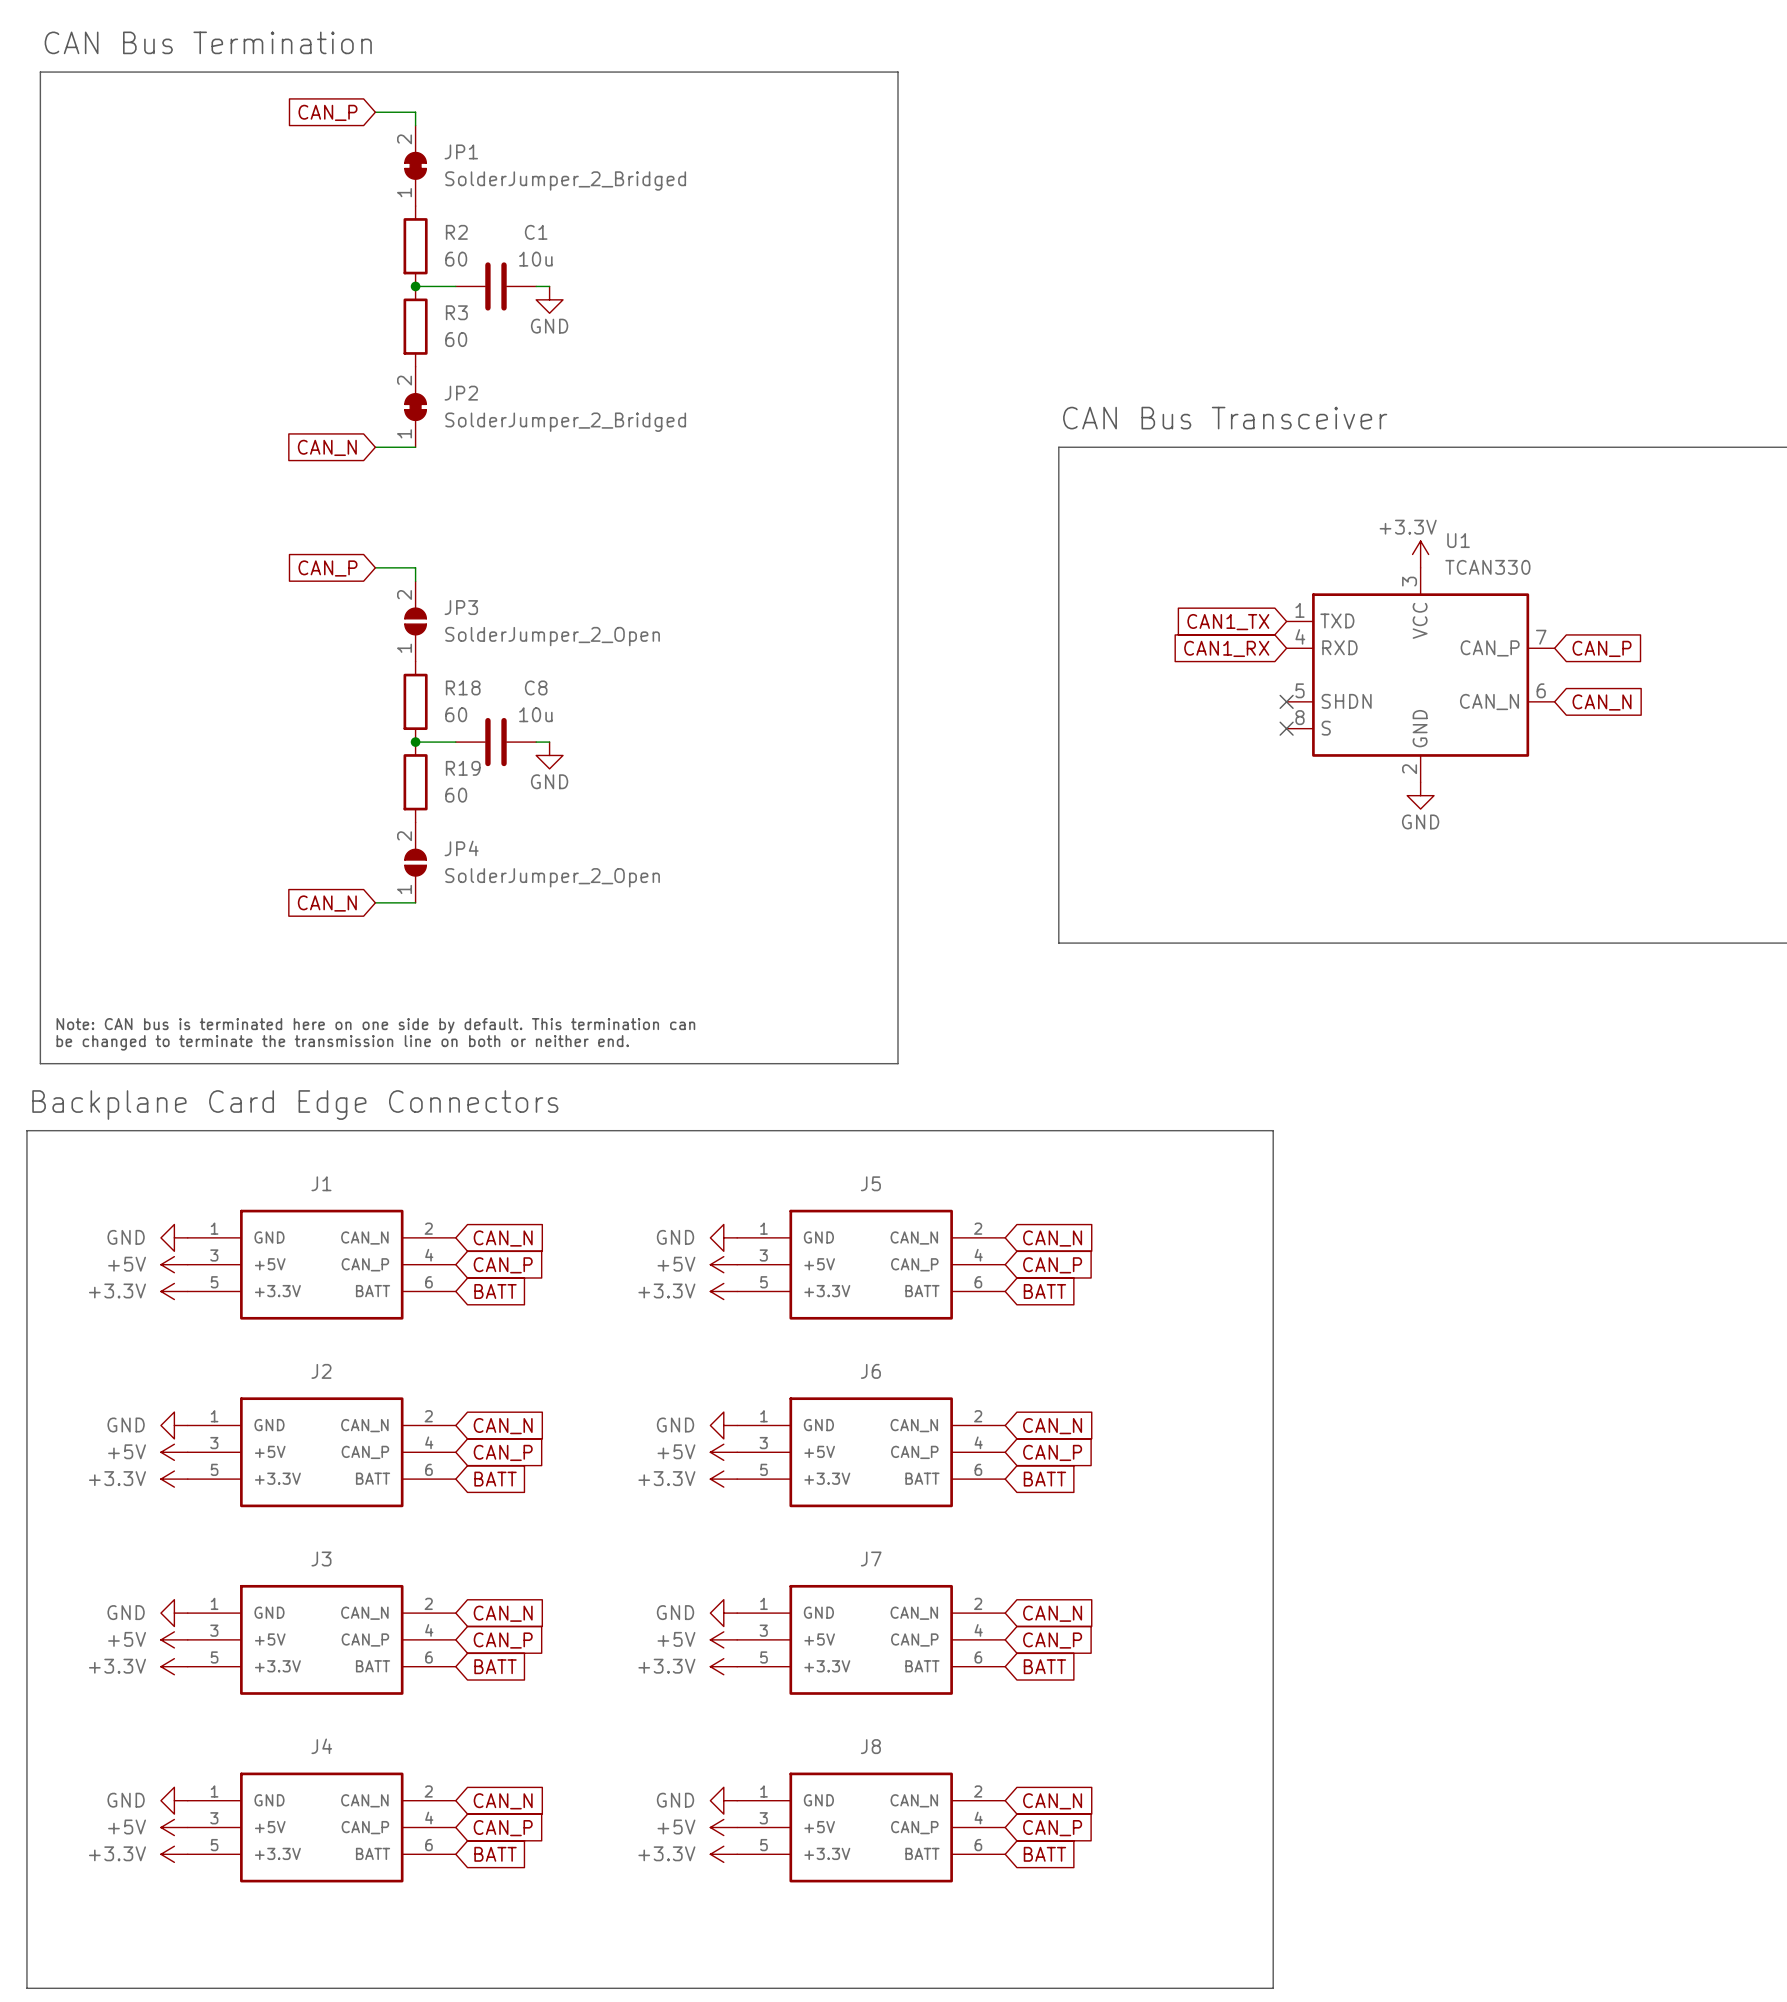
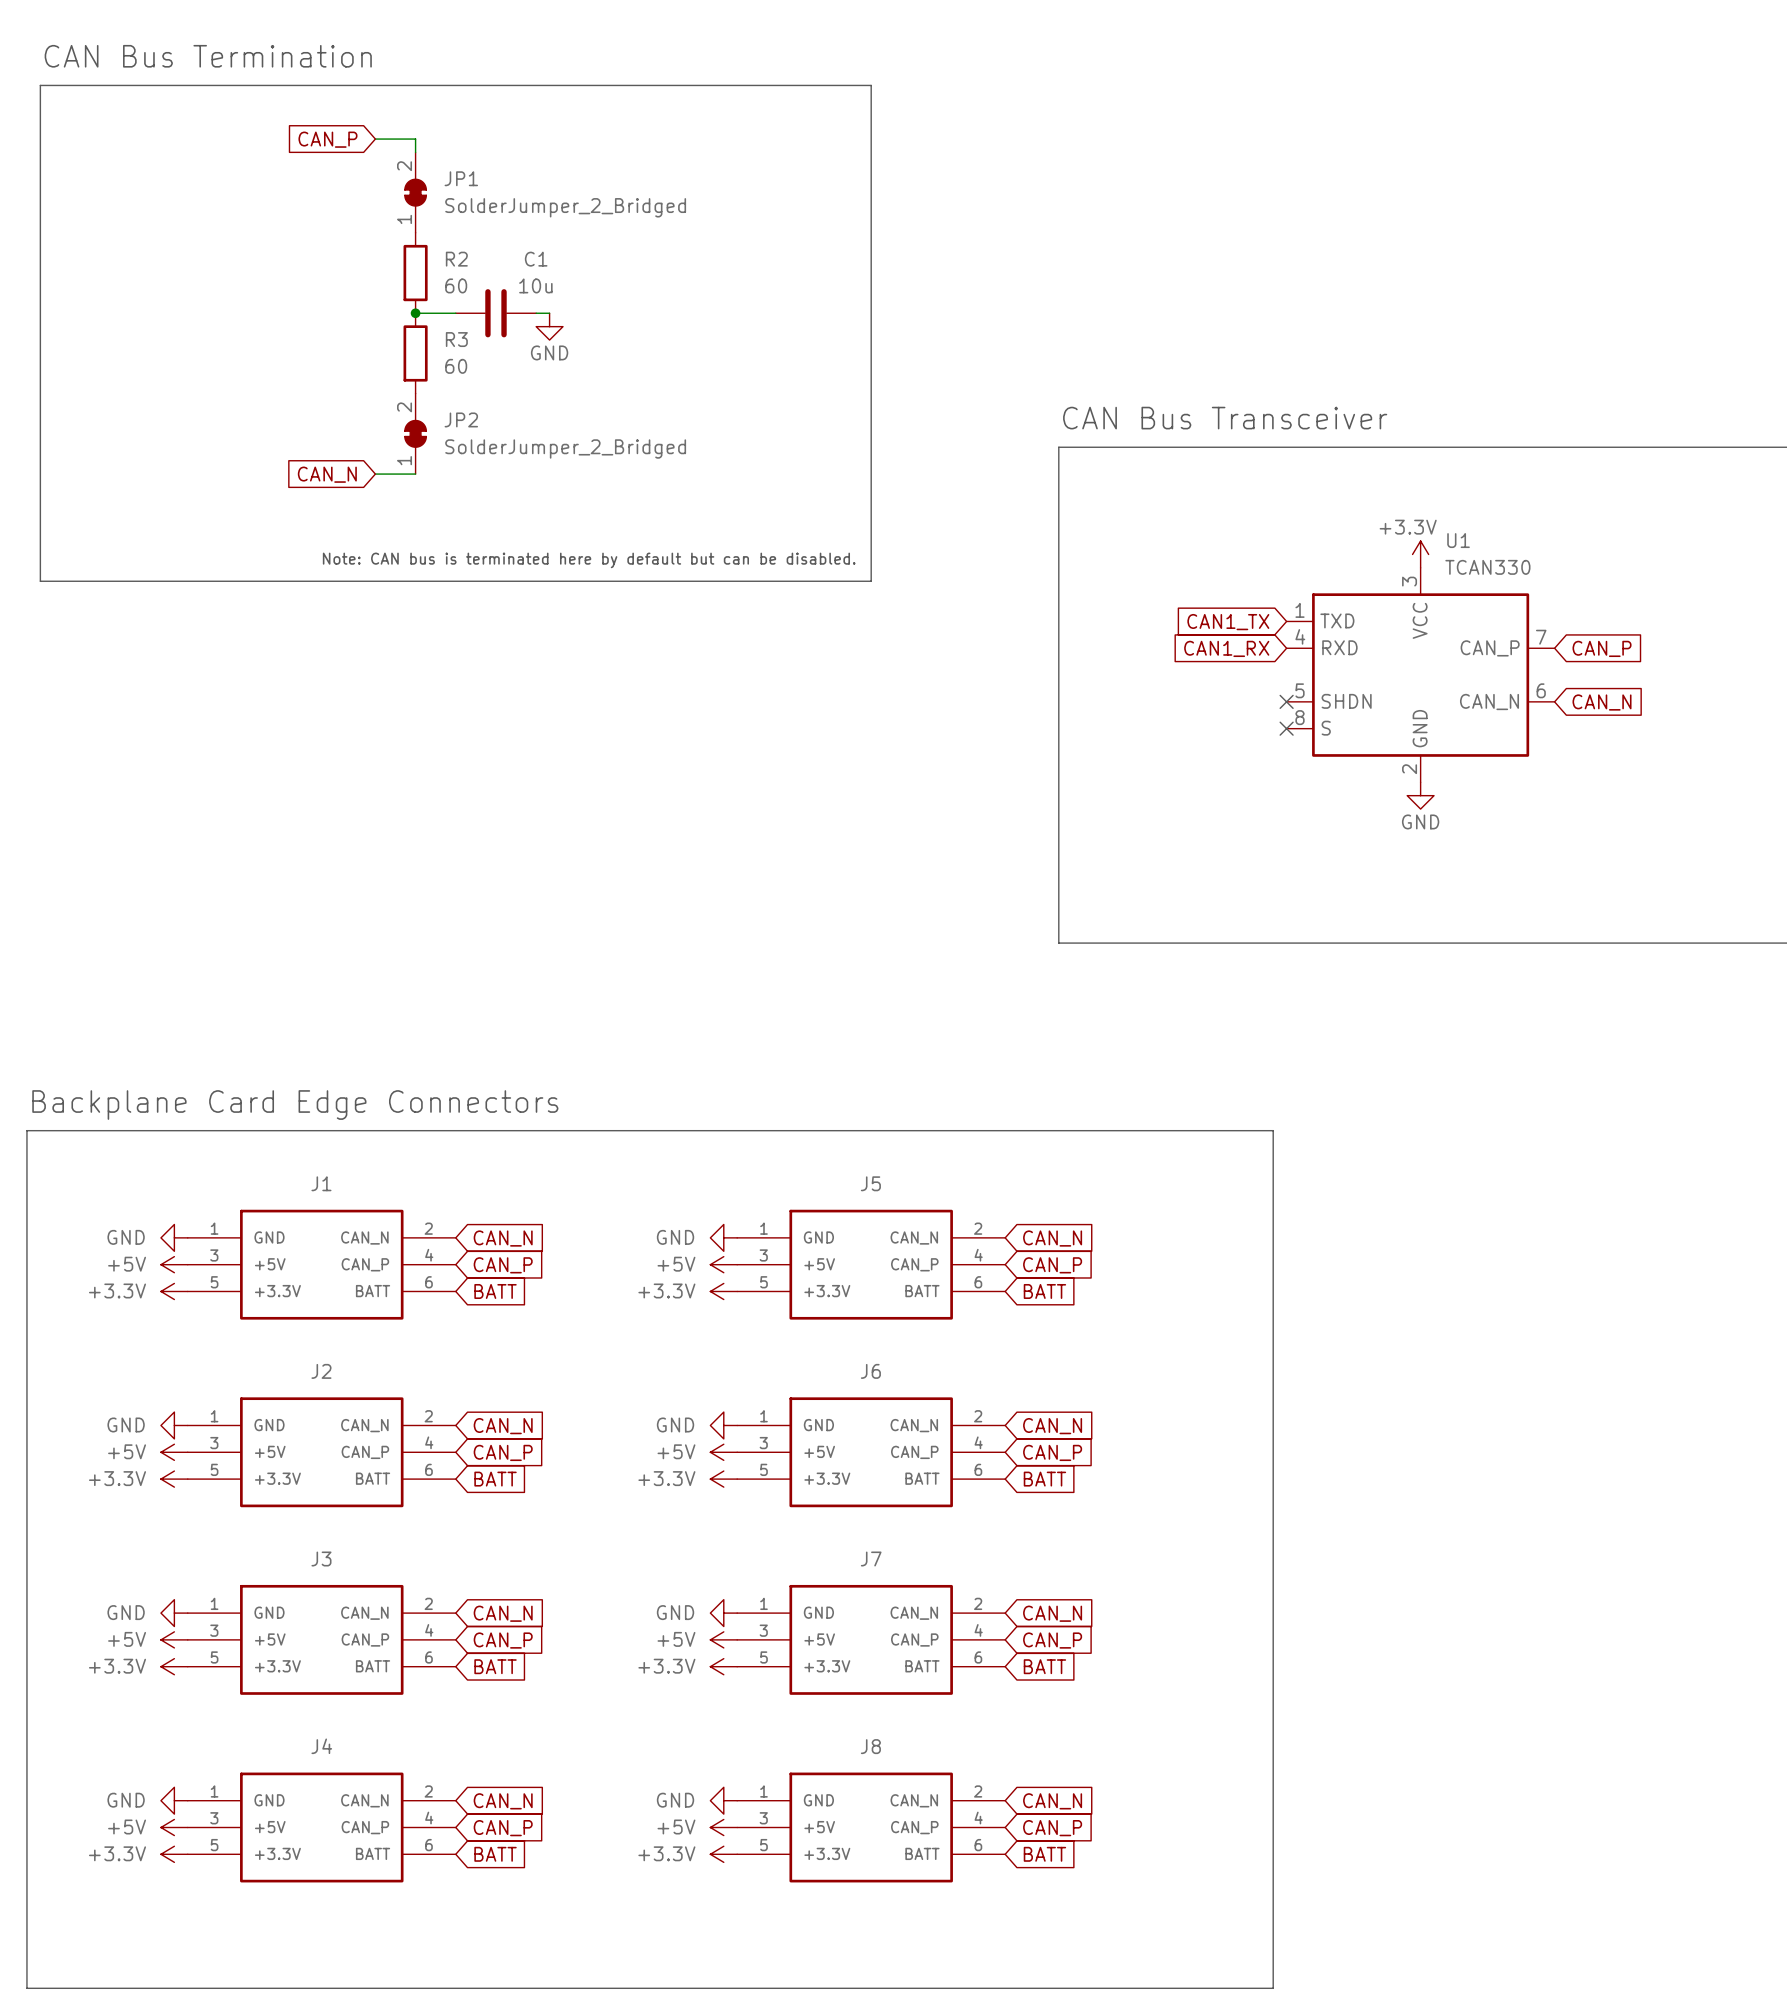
text position: CAN Bus Termination (208, 42) -> CAN Bus Termination (208, 56)
line: (40, 85) (40, 72) (897, 72) (897, 1063) (40, 1063) (40, 581) -> (40, 85) (871, 85) (871, 581) (40, 581)
global label position: CAN_P (327, 112) -> CAN_P (327, 139)
wire: (375, 112) (415, 112) (415, 125) -> (375, 139) (415, 139) (415, 152)
JP1 position: (415, 165) -> (415, 192)
R2 position: (415, 246) -> (415, 273)
wire: (415, 286) (455, 286) -> (415, 313) (455, 313)
junction position: (415, 286) -> (415, 313)
C1 position: (495, 286) -> (495, 313)
wire: (536, 286) (549, 286) -> (536, 313) (549, 313)
power symbol position: GND (549, 299) -> GND (549, 326)
R3 position: (415, 326) -> (415, 353)
JP2 position: (415, 407) -> (415, 433)
global label position: CAN_N (327, 447) -> CAN_N (327, 474)
wire: (375, 447) (415, 447) -> (375, 474) (415, 474)
text: none -> Note: CAN bus is terminated here by default but can be disabled. (589, 560)
wire: (375, 567) (415, 567) (415, 581) -> none
global label: CAN_P (327, 568) -> none
JP3: SolderJumper_2_Open (415, 621) -> none
R18: 60 (415, 701) -> none
wire: (415, 742) (455, 742) -> none
junction: (415, 742) -> none
C8: 10u (495, 742) -> none
wire: (536, 742) (549, 742) -> none
power symbol: GND (549, 755) -> none
R19: 60 (415, 782) -> none
JP4: SolderJumper_2_Open (415, 862) -> none
wire: (375, 902) (415, 902) -> none
global label: CAN_N (327, 903) -> none
text: Note: CAN bus is terminated here on one side by default. This termination can (375, 1025) -> none
text: be changed to terminate the transmission line on both or neither end. (342, 1042) -> none

